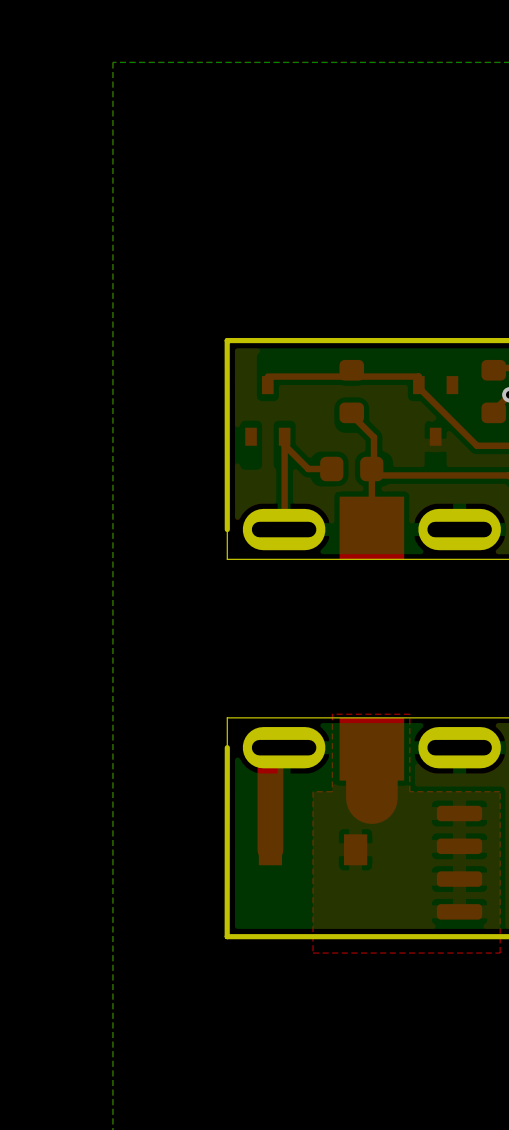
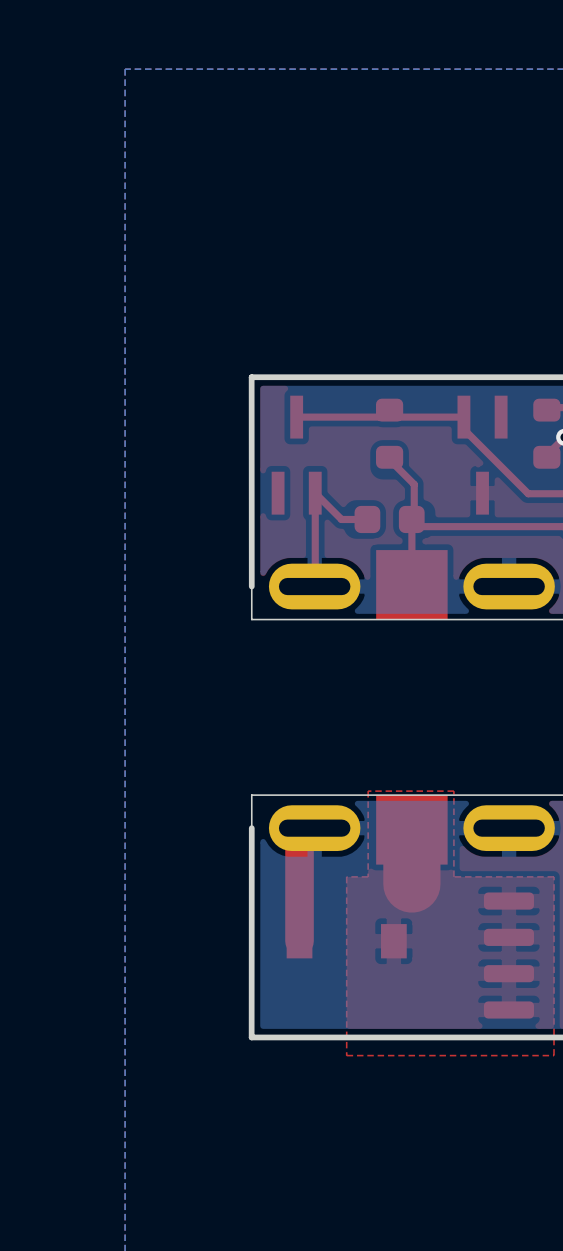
part footprint: [245, 376, 291, 446] -> [271, 395, 322, 515]
part footprint: [413, 376, 459, 446] -> [457, 395, 508, 515]

